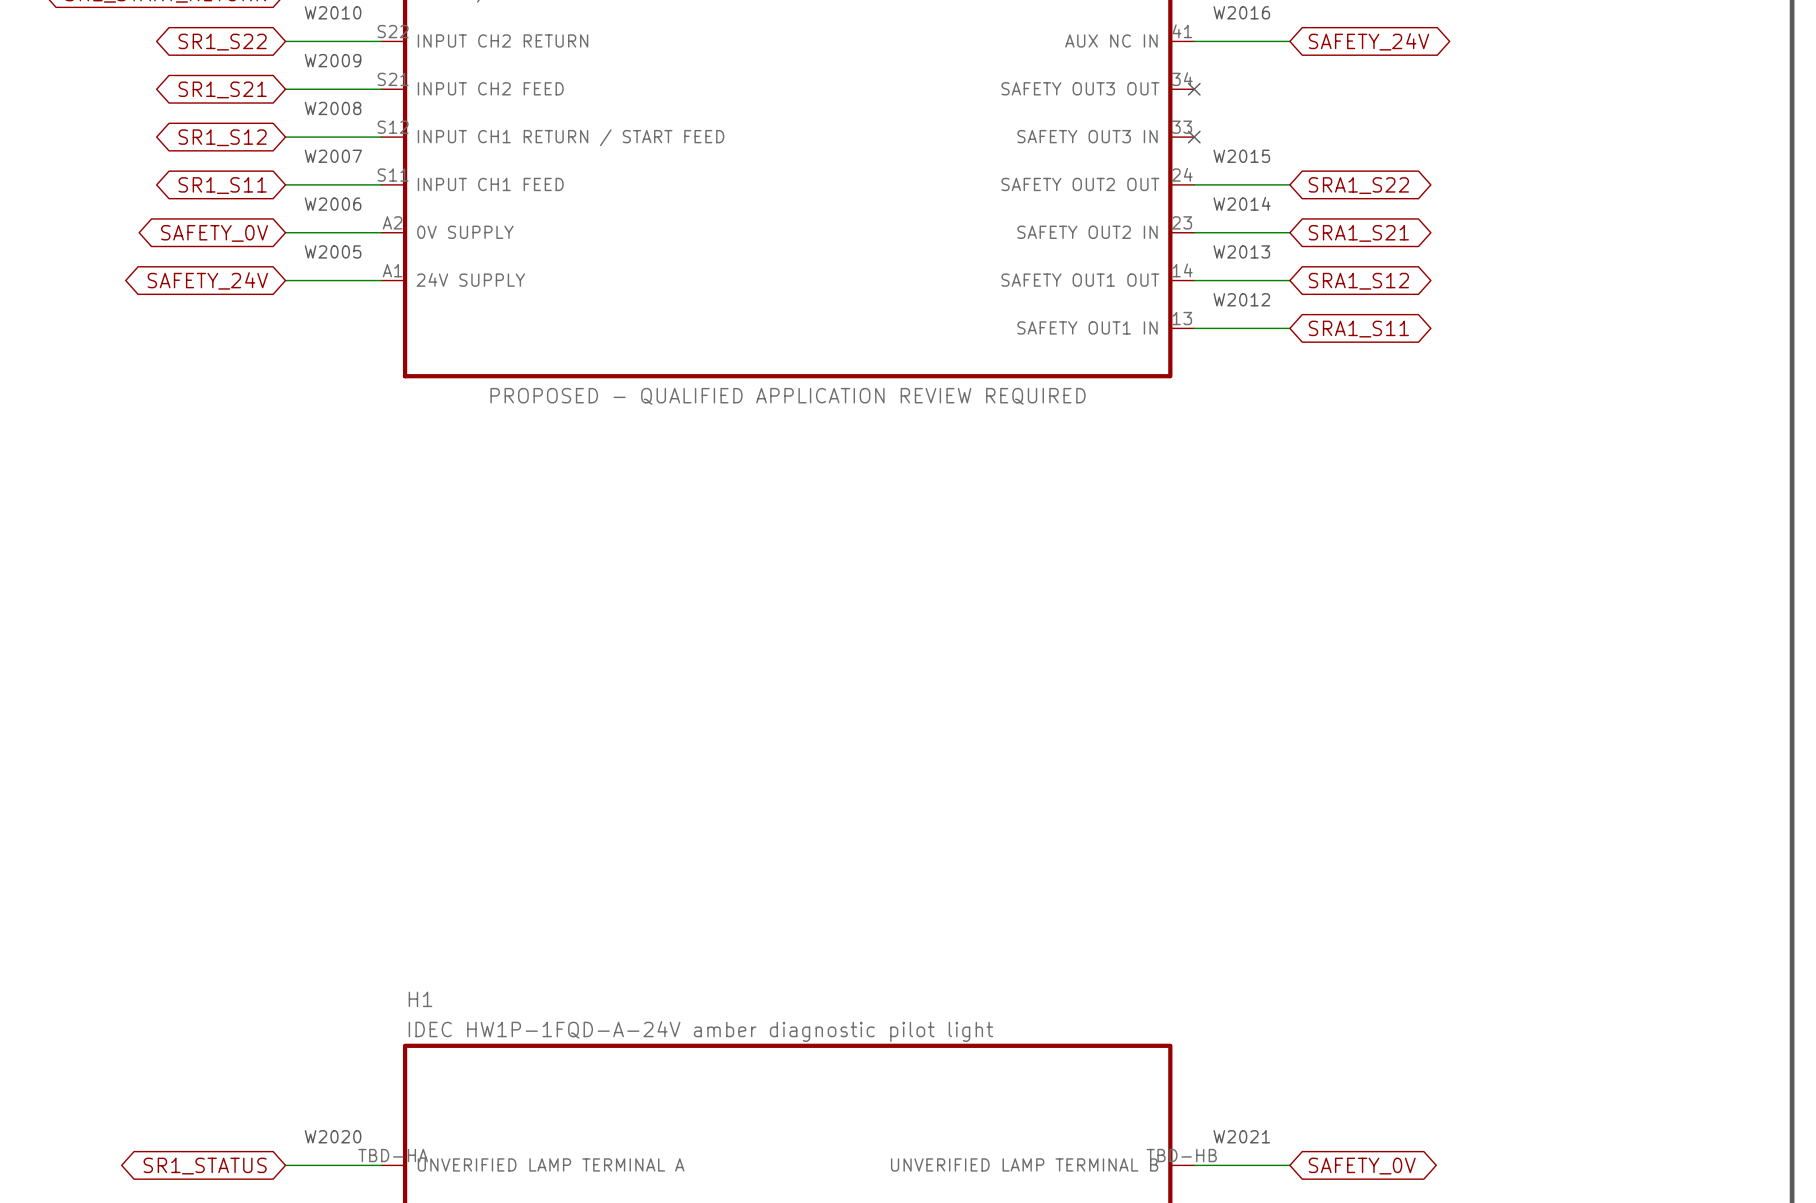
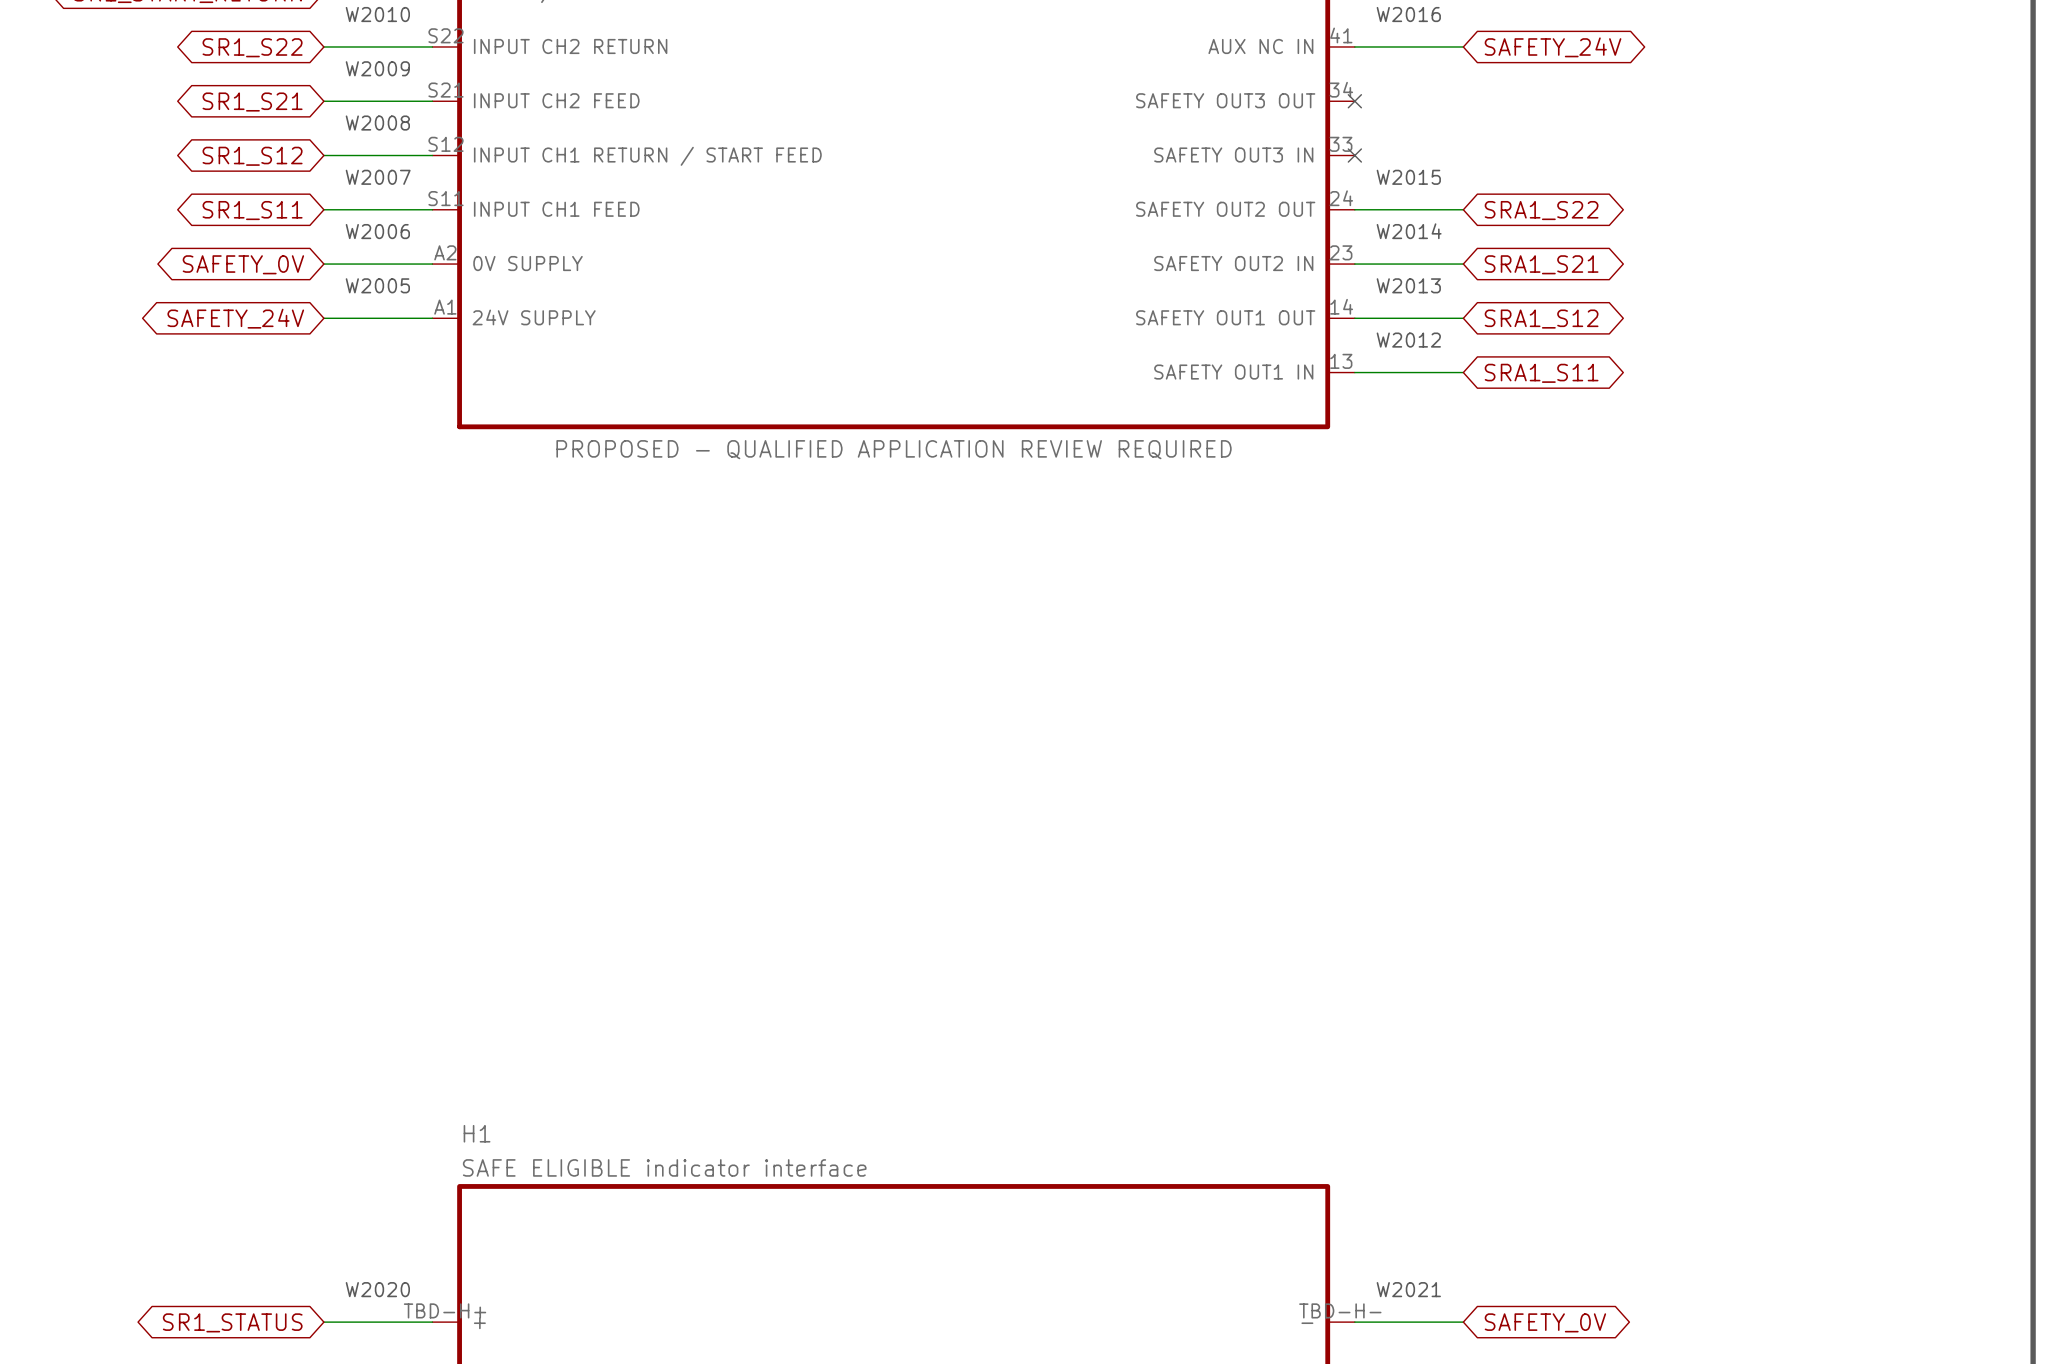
H1 text: IDEC HW1P-1FQD-A-24V amber diagnostic pilot light (700, 1031) -> SAFE ELIGIBLE indicator interface (664, 1167)
H1 pin number: TBD-HA (393, 1155) -> TBD-H+ (445, 1310)
H1 pin number: TBD-HB (1181, 1155) -> TBD-H- (1340, 1310)
H1 pin name: UNVERIFIED LAMP TERMINAL A (551, 1164) -> + (479, 1323)
H1 pin name: UNVERIFIED LAMP TERMINAL B (1024, 1164) -> - (1307, 1323)

